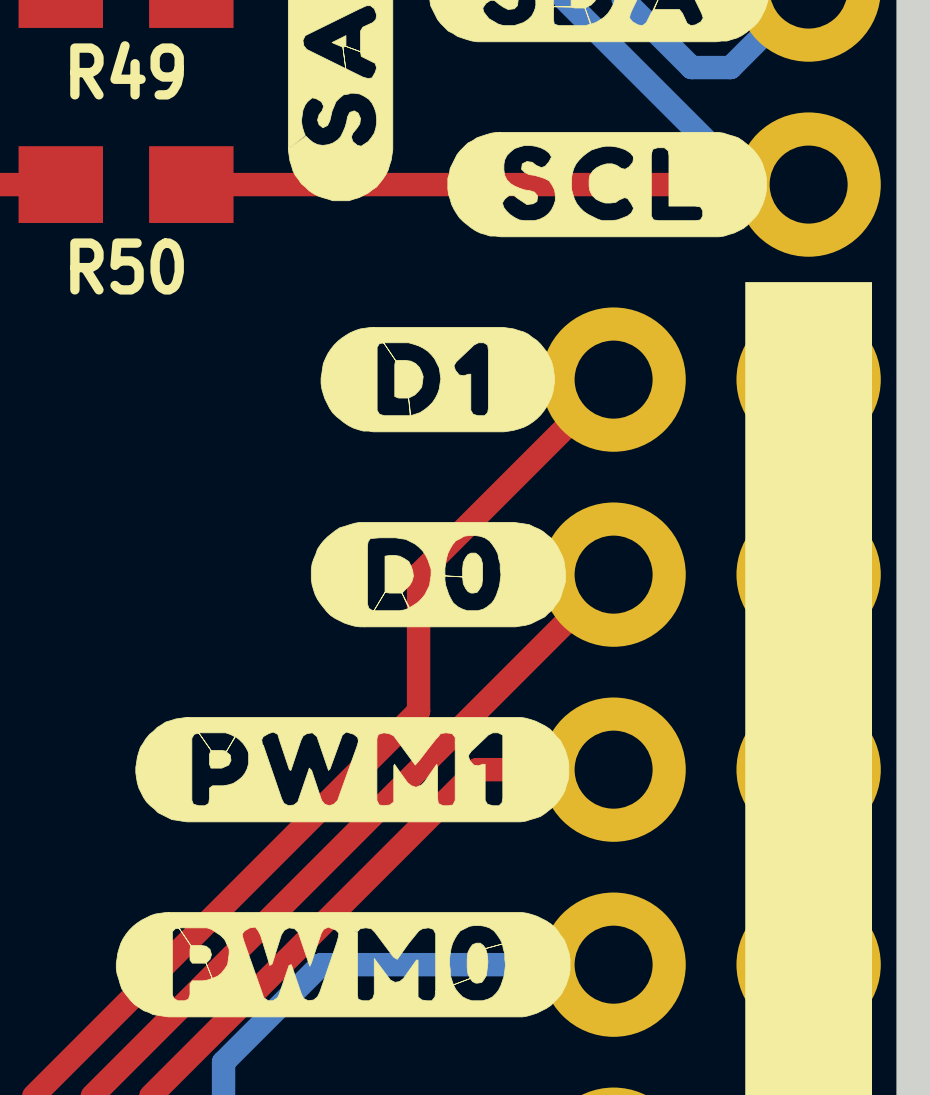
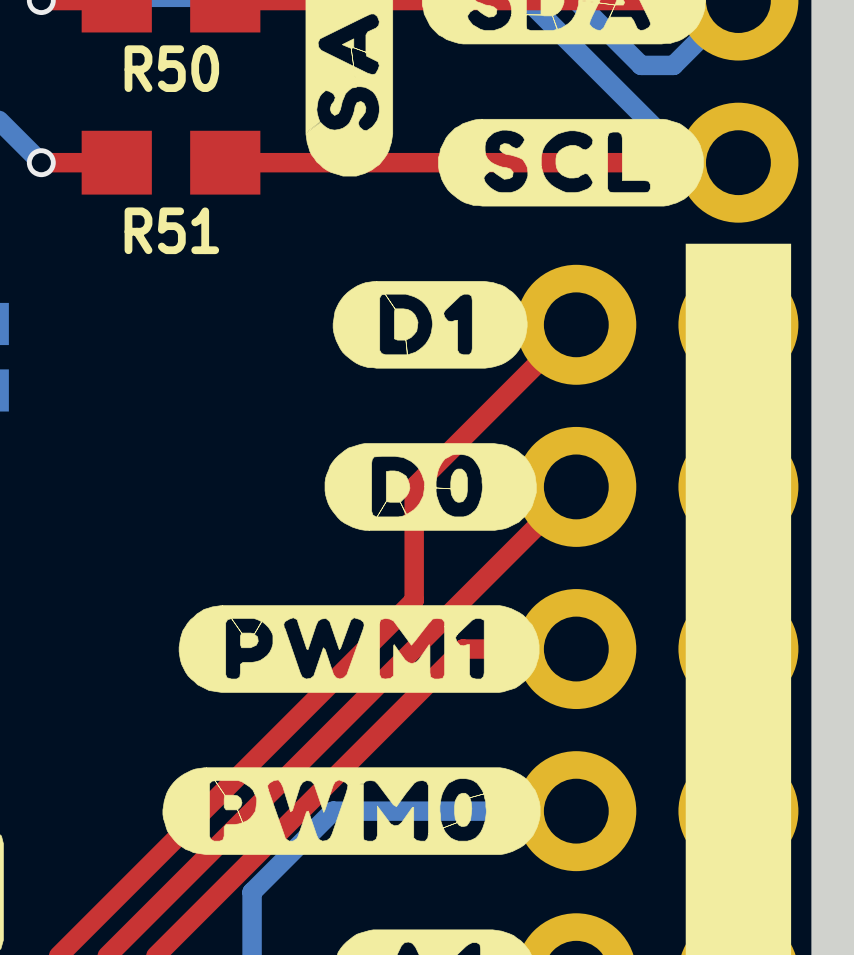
R49 name: R49 (127, 70) -> R50 (171, 68)
R50 name: R50 (127, 266) -> R51 (171, 230)

